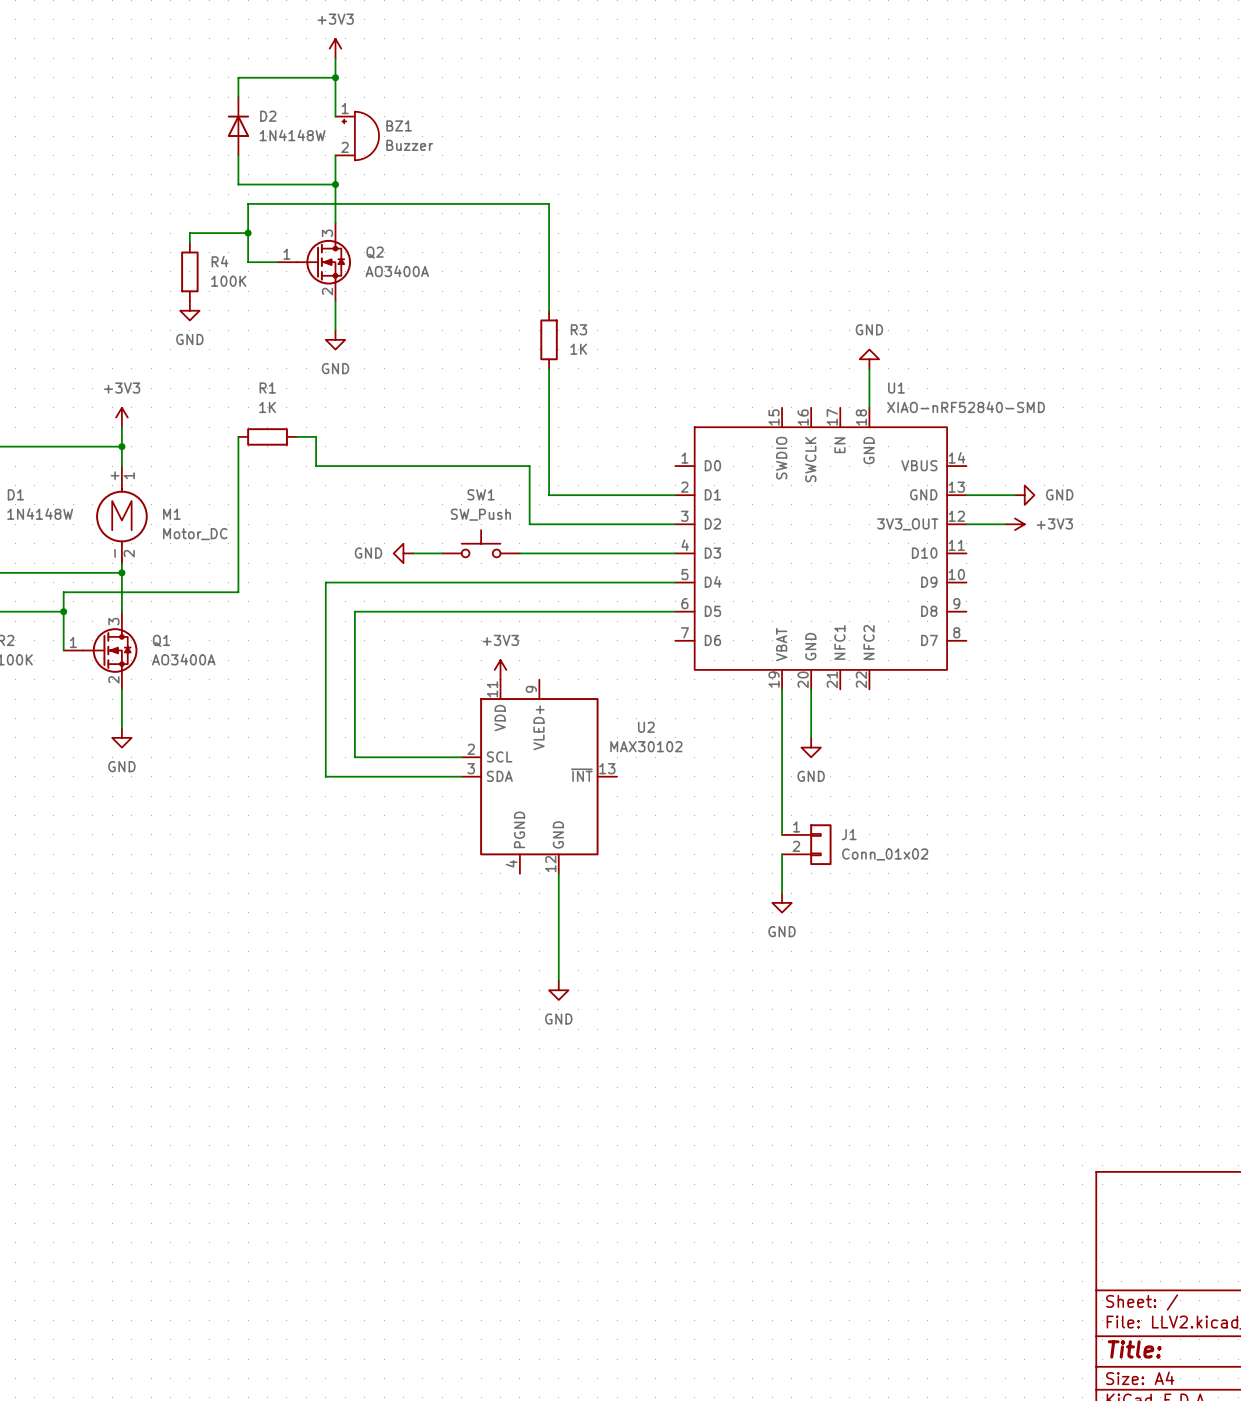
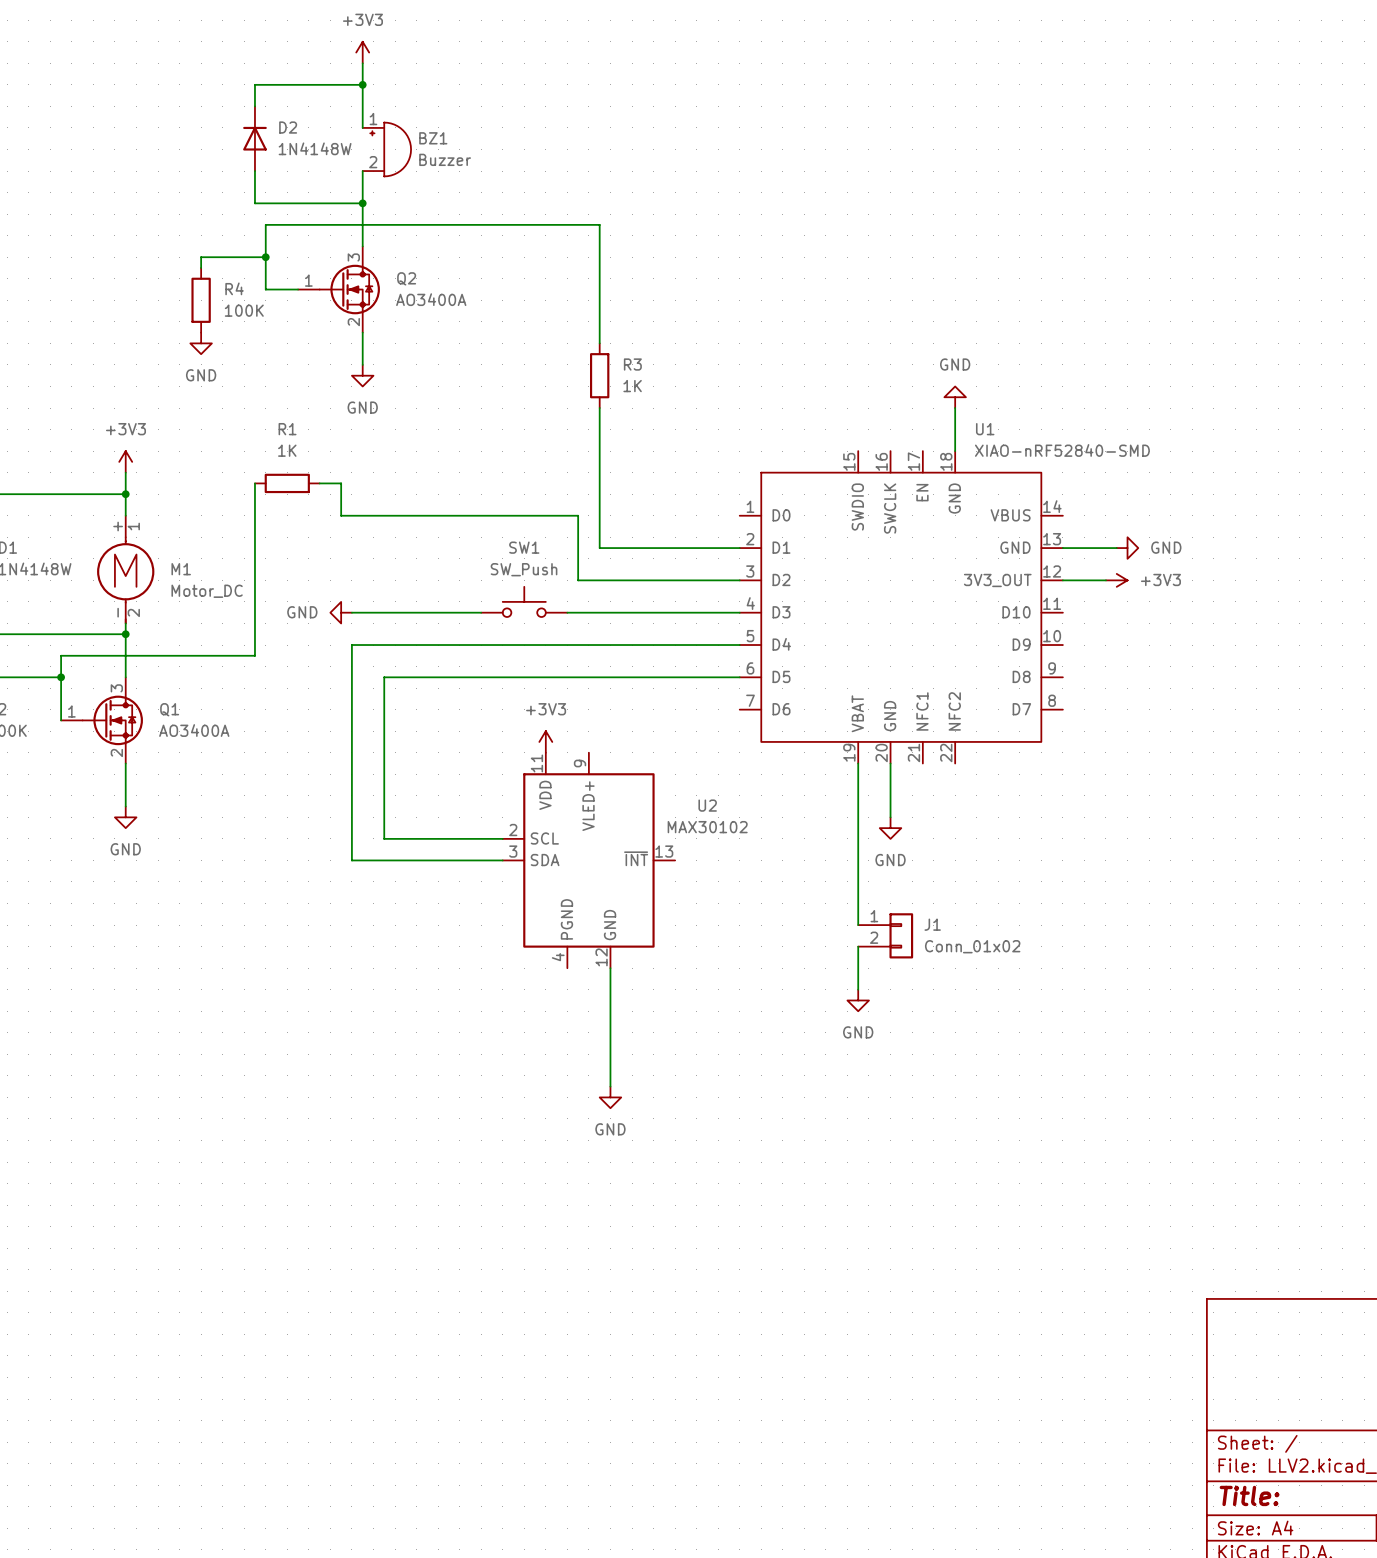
wire: none -> (351, 612) (448, 612)
power symbol position: GND (403, 553) -> GND (341, 612)

